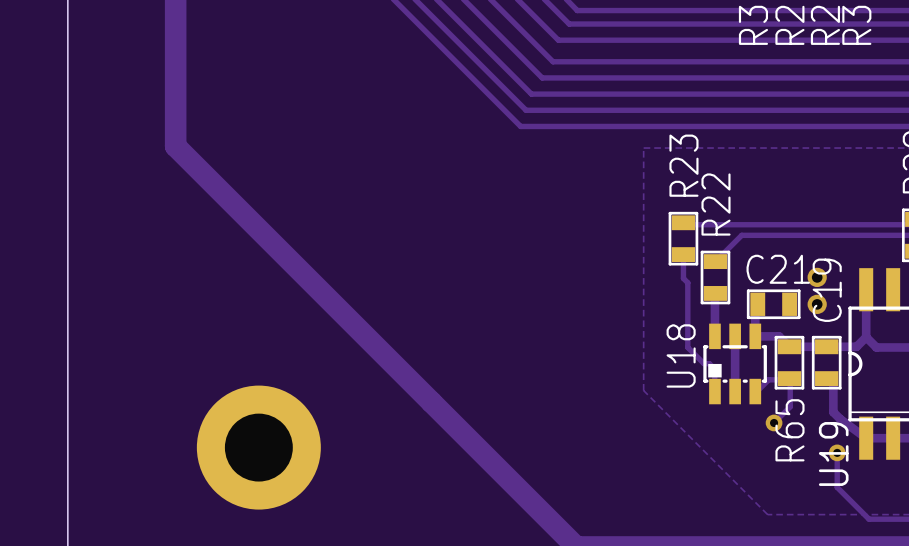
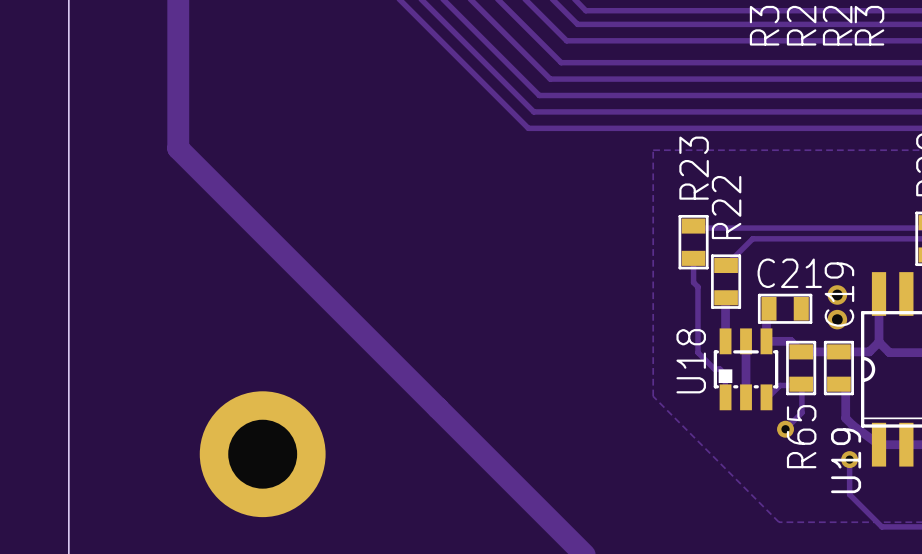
via: (817, 277) -> none
via: none -> (837, 294)
via: (817, 304) -> none
via: none -> (837, 319)

